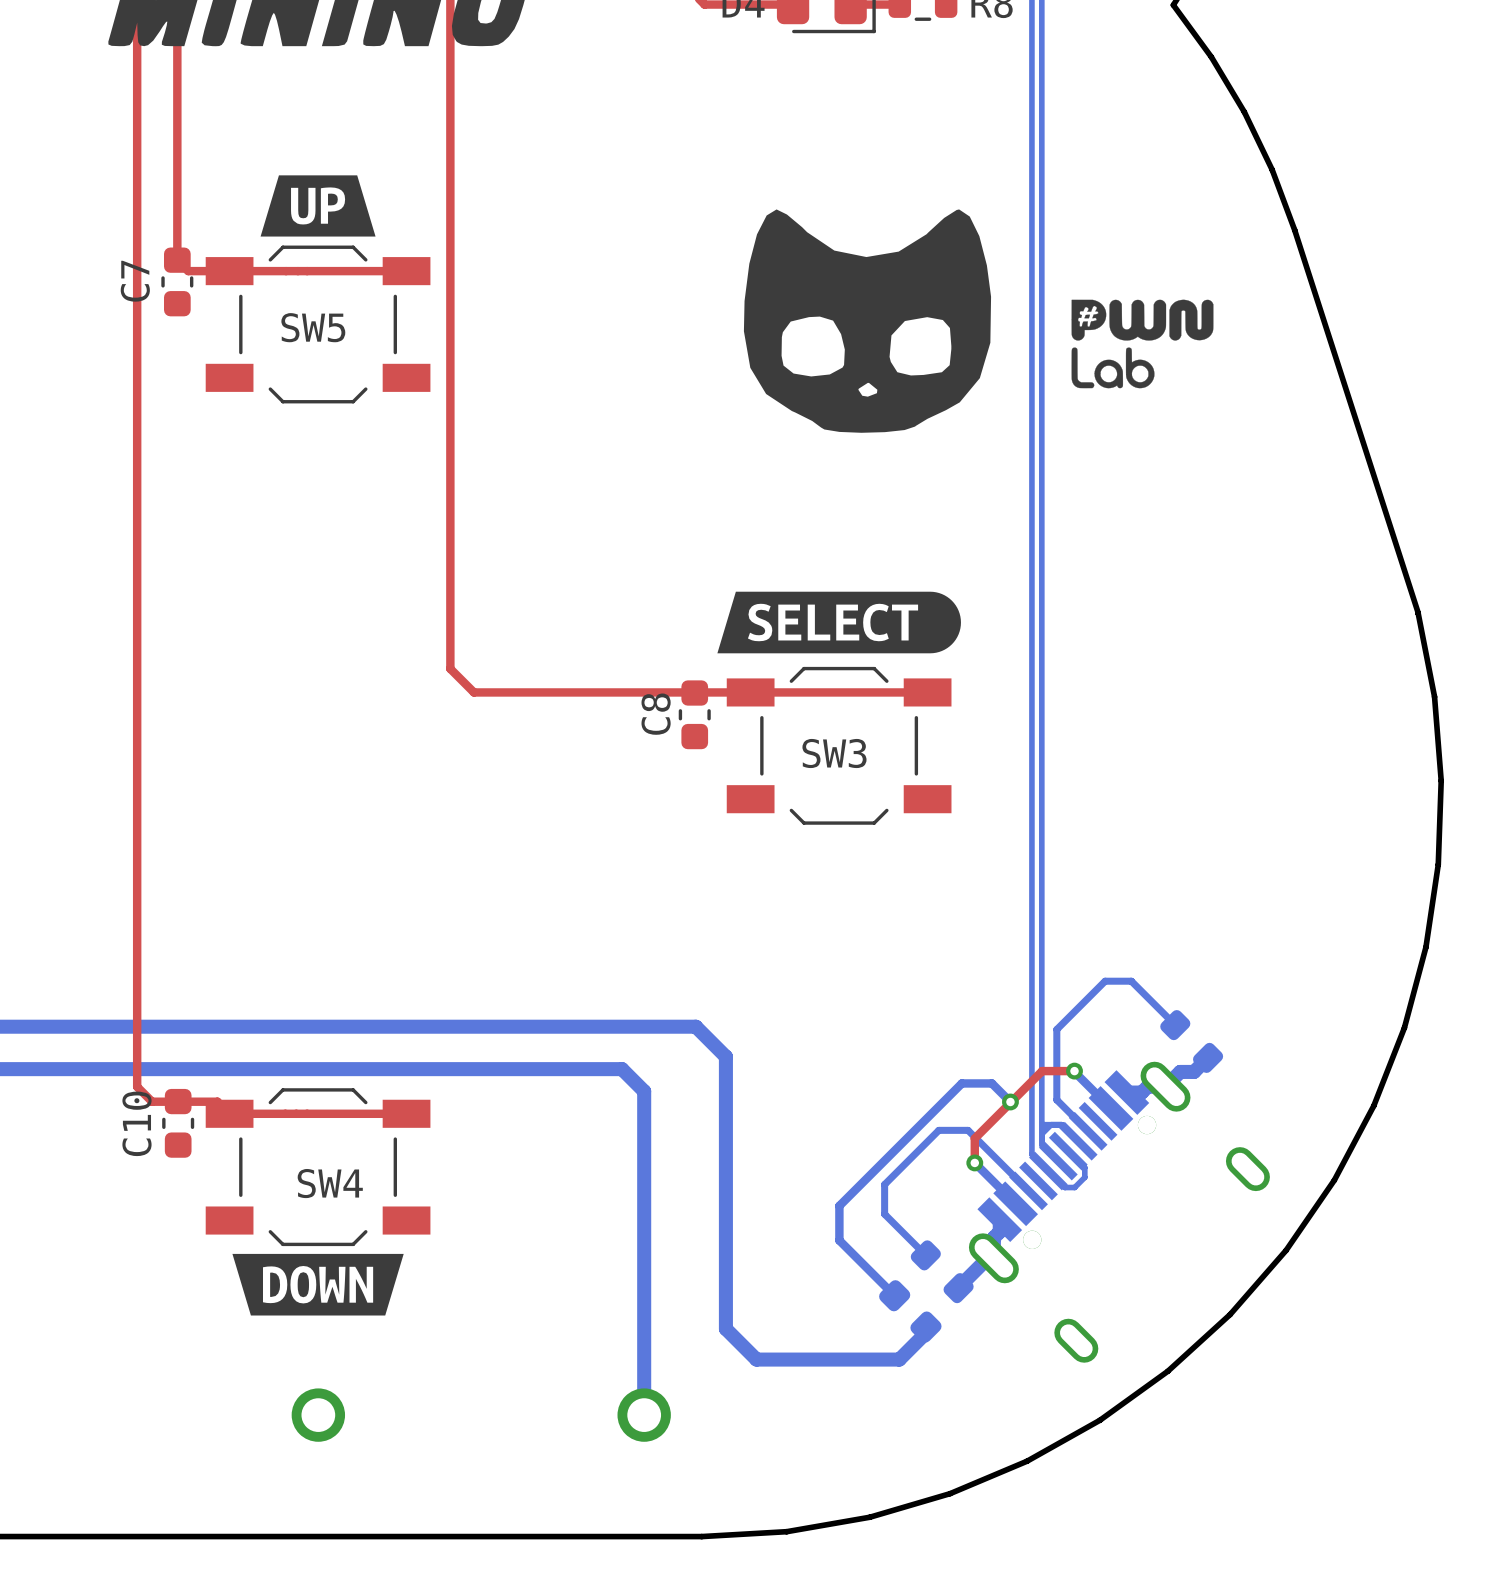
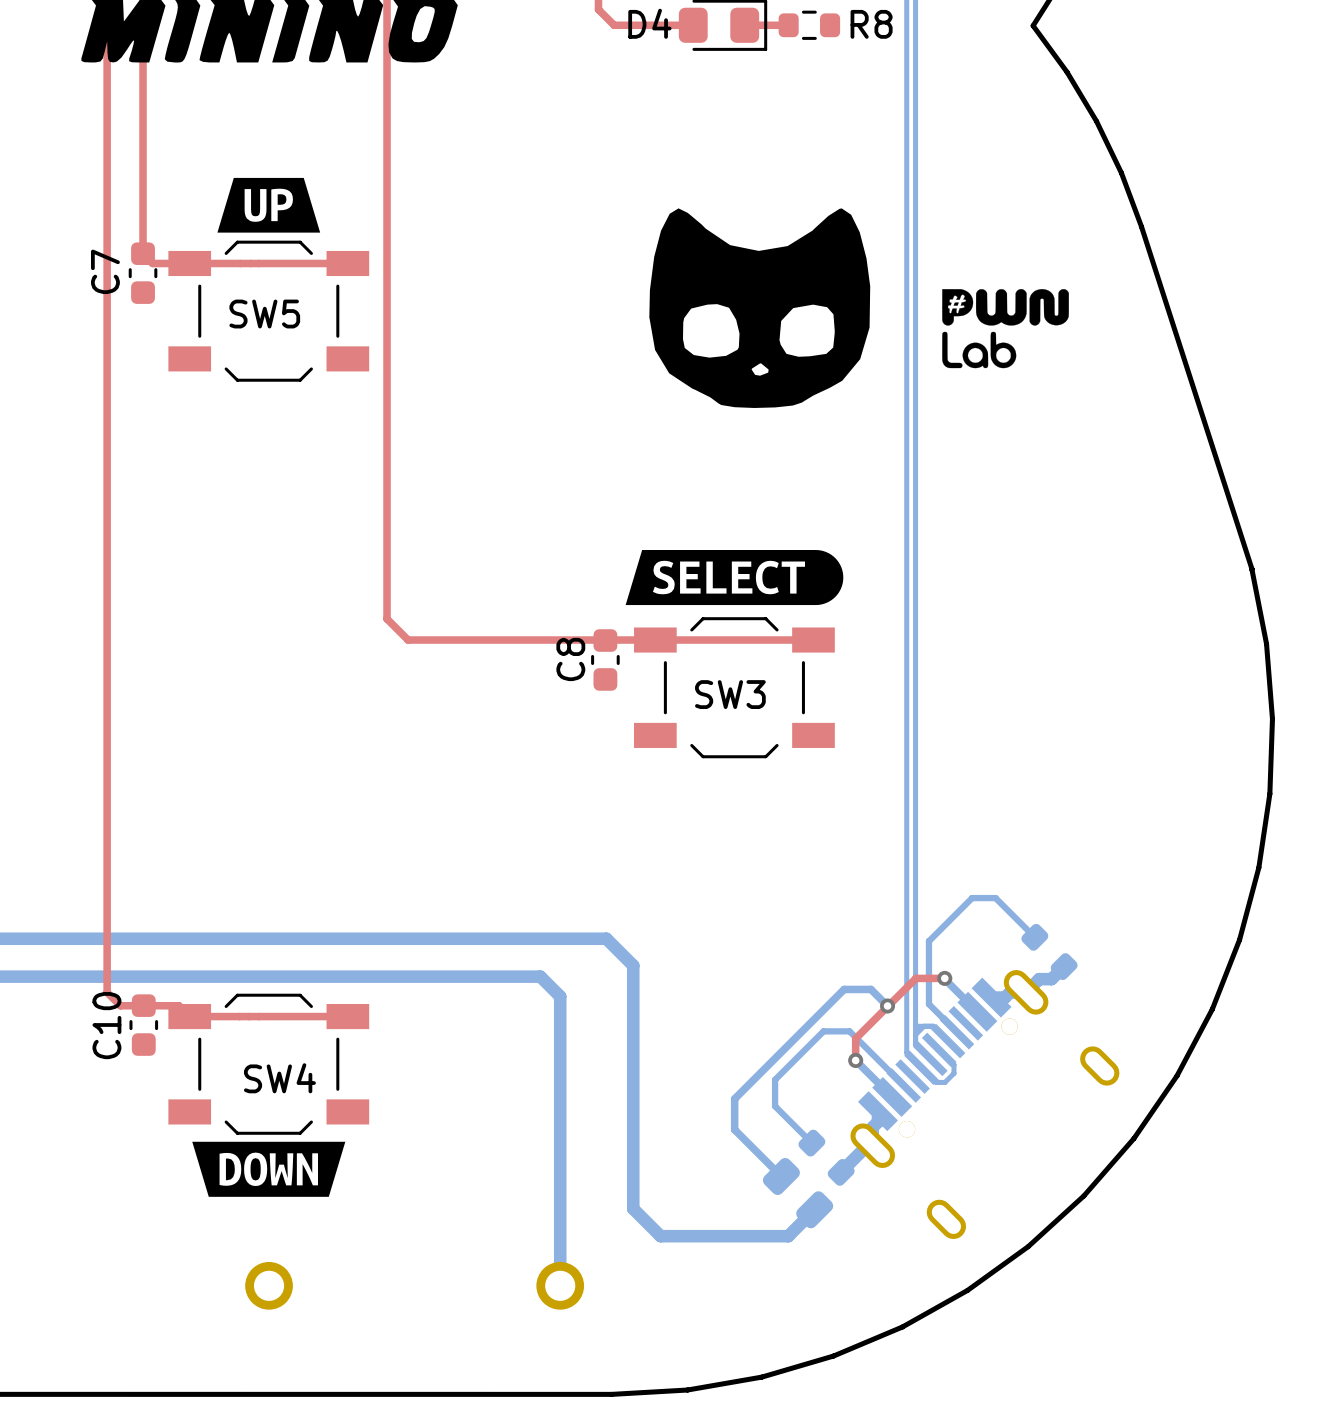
part footprint: [879, 1280, 942, 1343] -> [762, 1157, 834, 1229]

